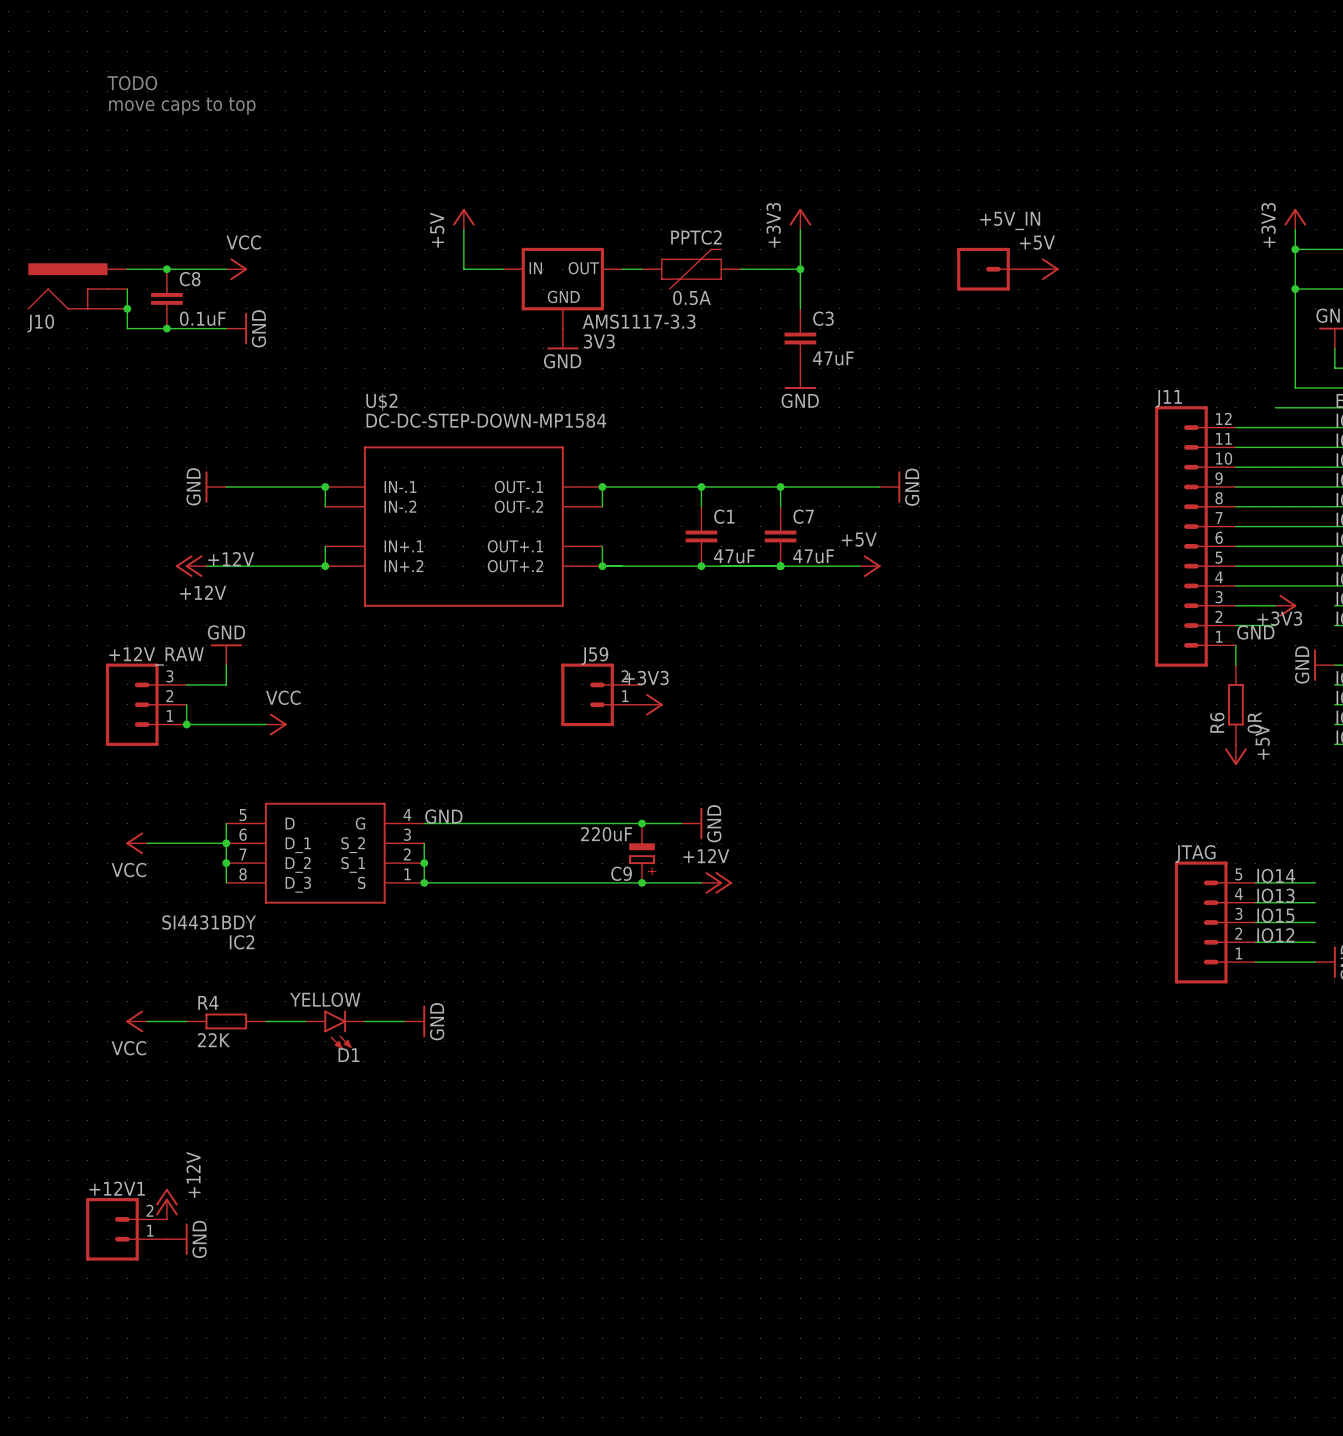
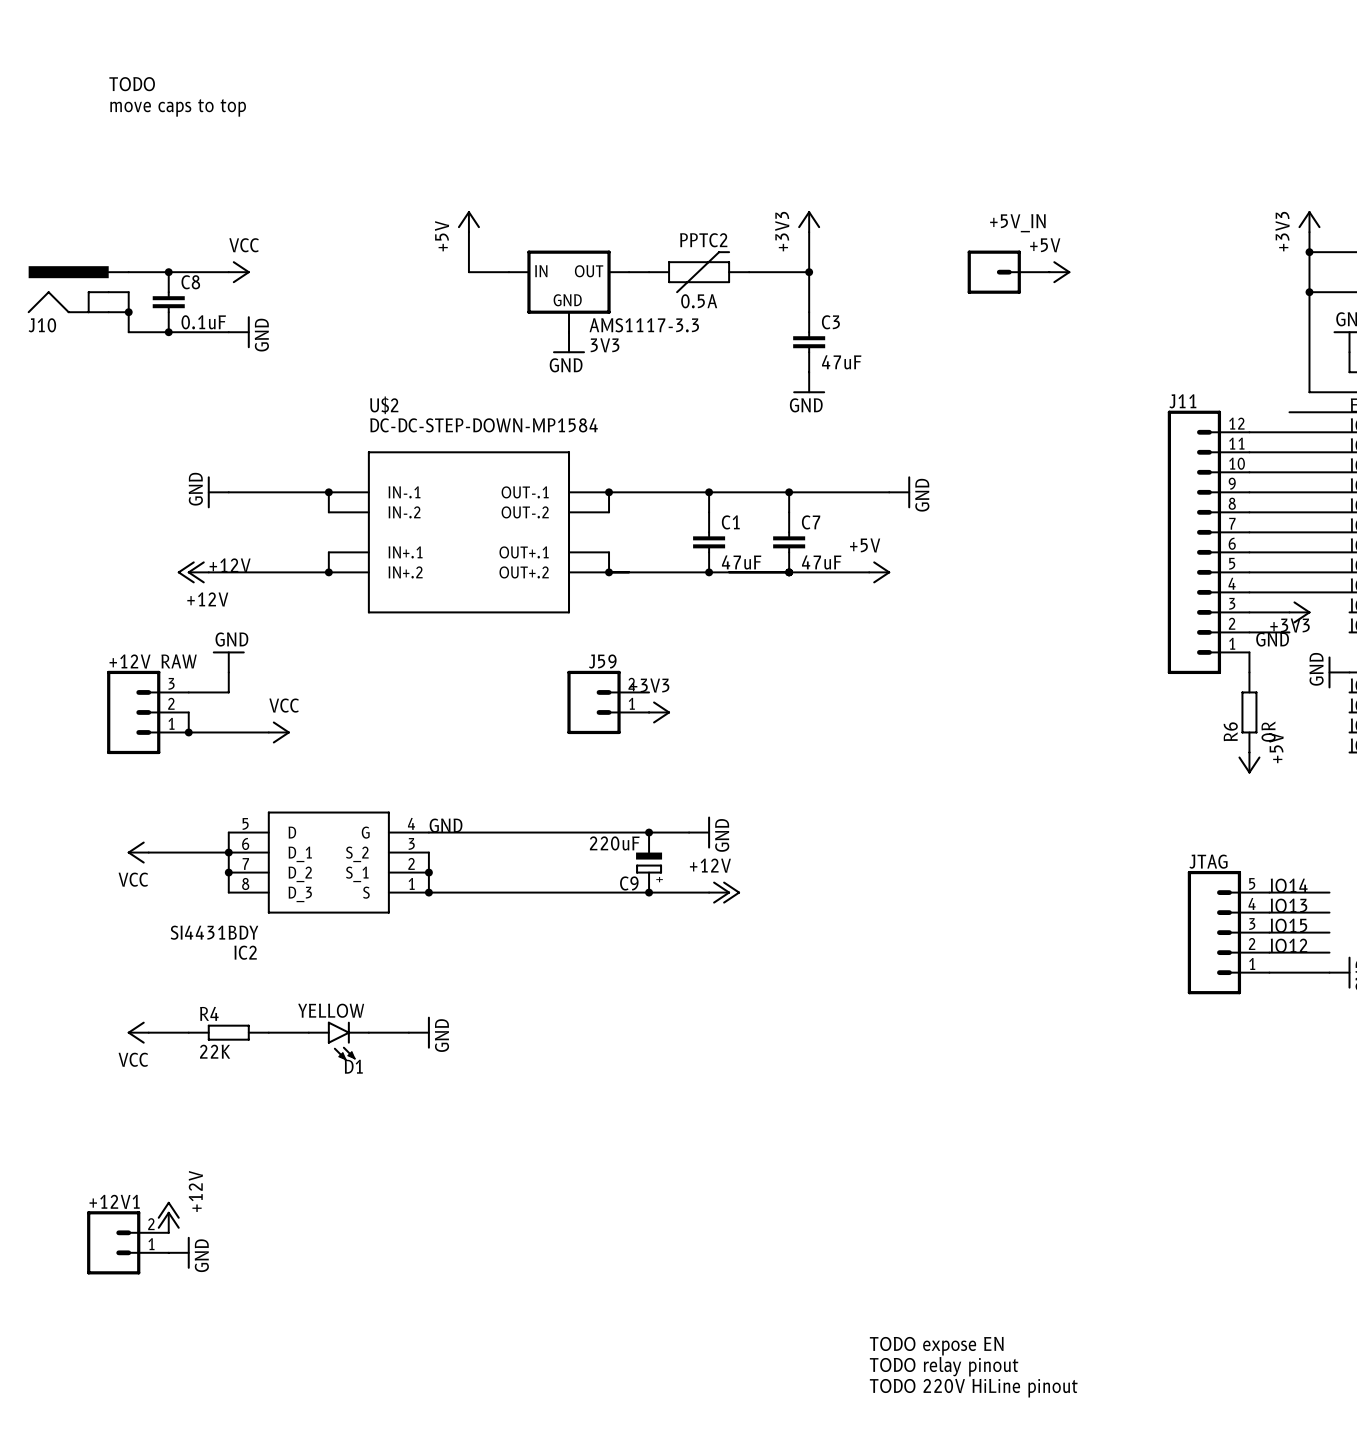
text: none -> TODO expose EN (936, 1346)
text: none -> TODO relay pinout (944, 1366)
text: none -> TODO 220V HiLine pinout (973, 1388)

